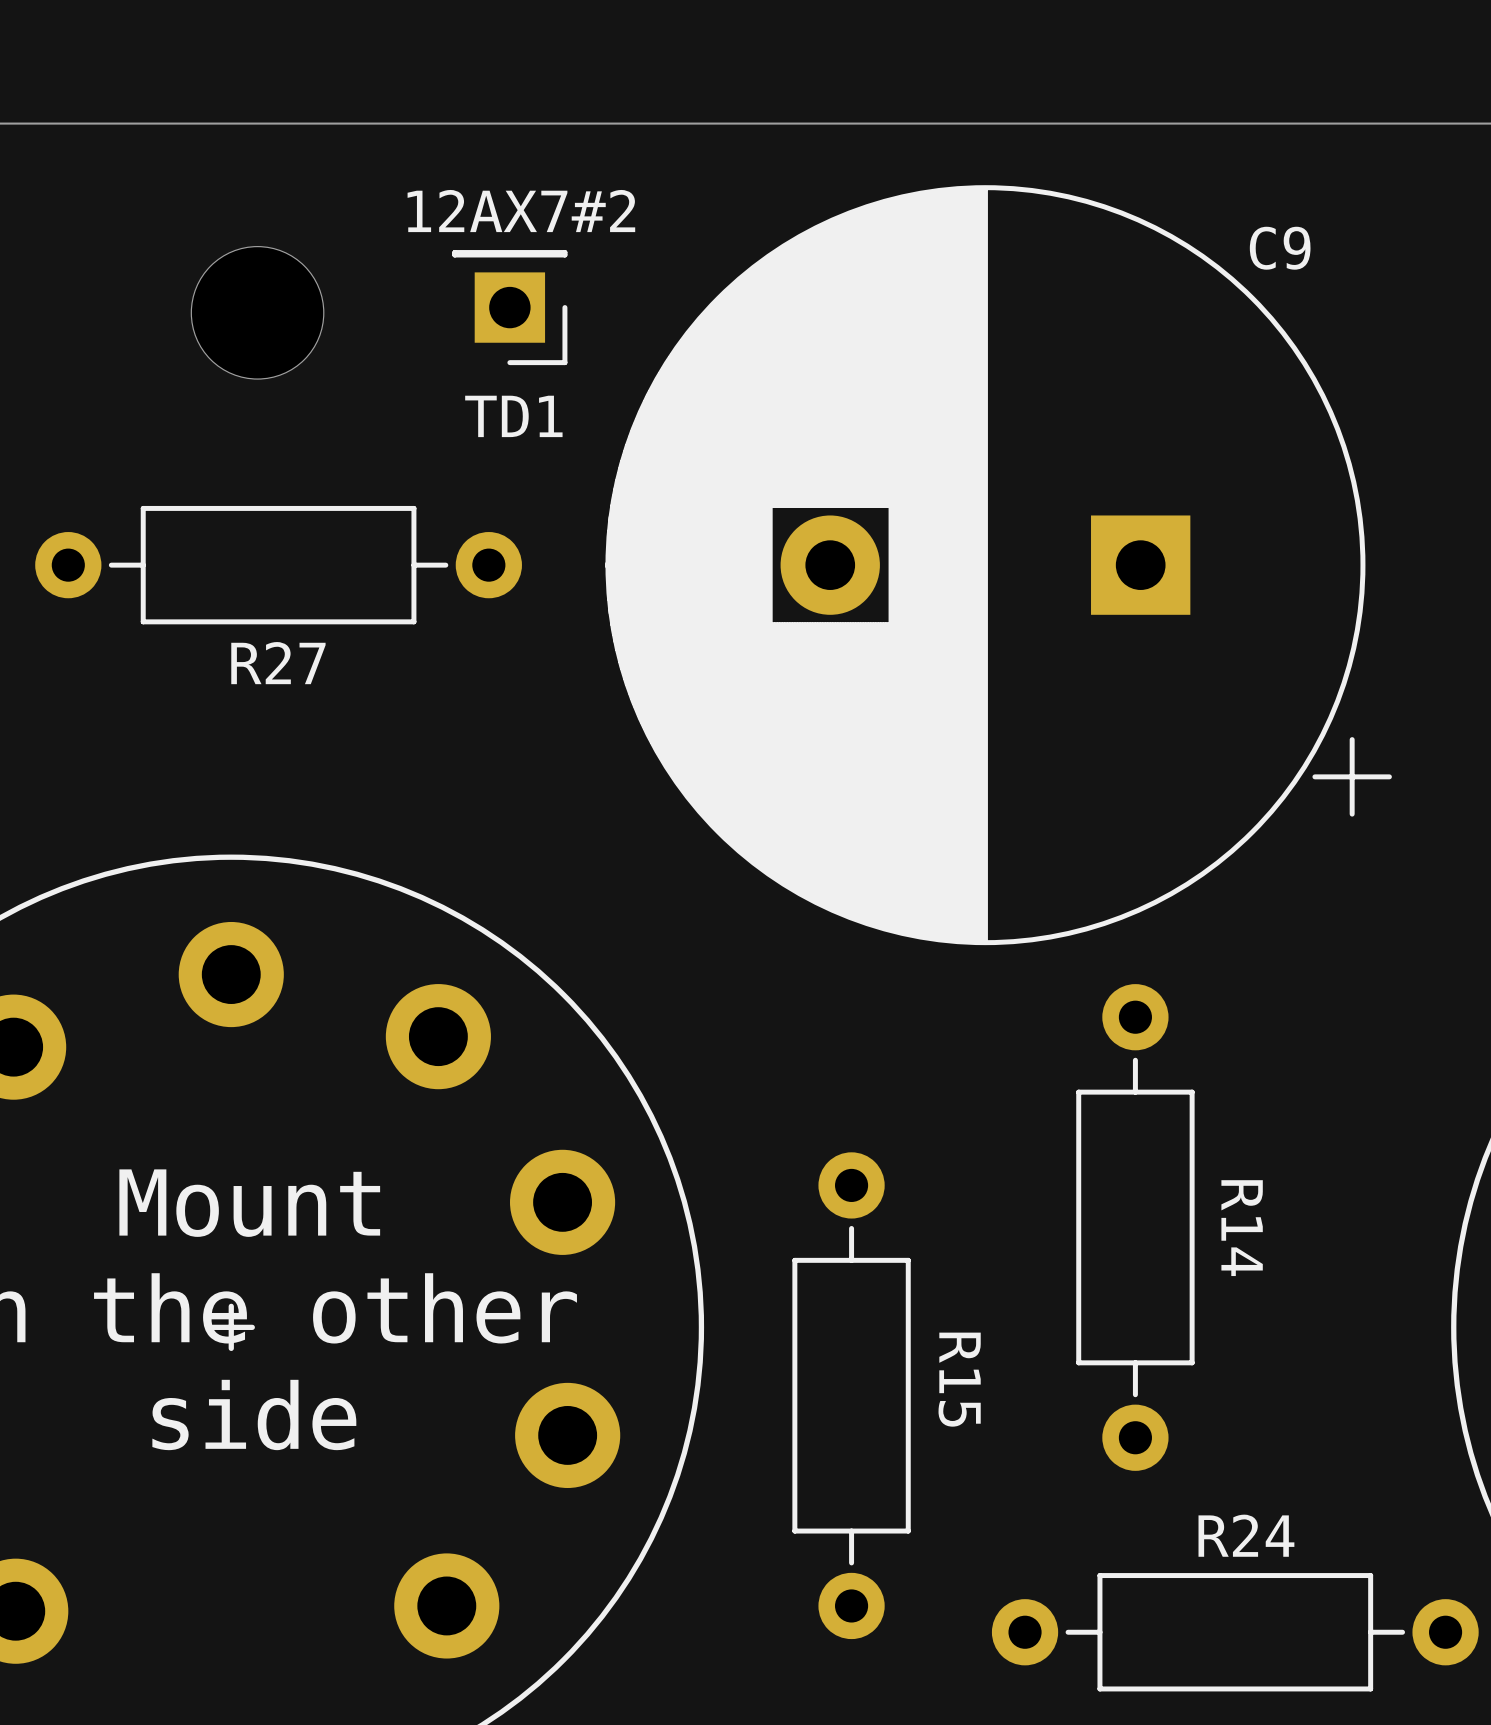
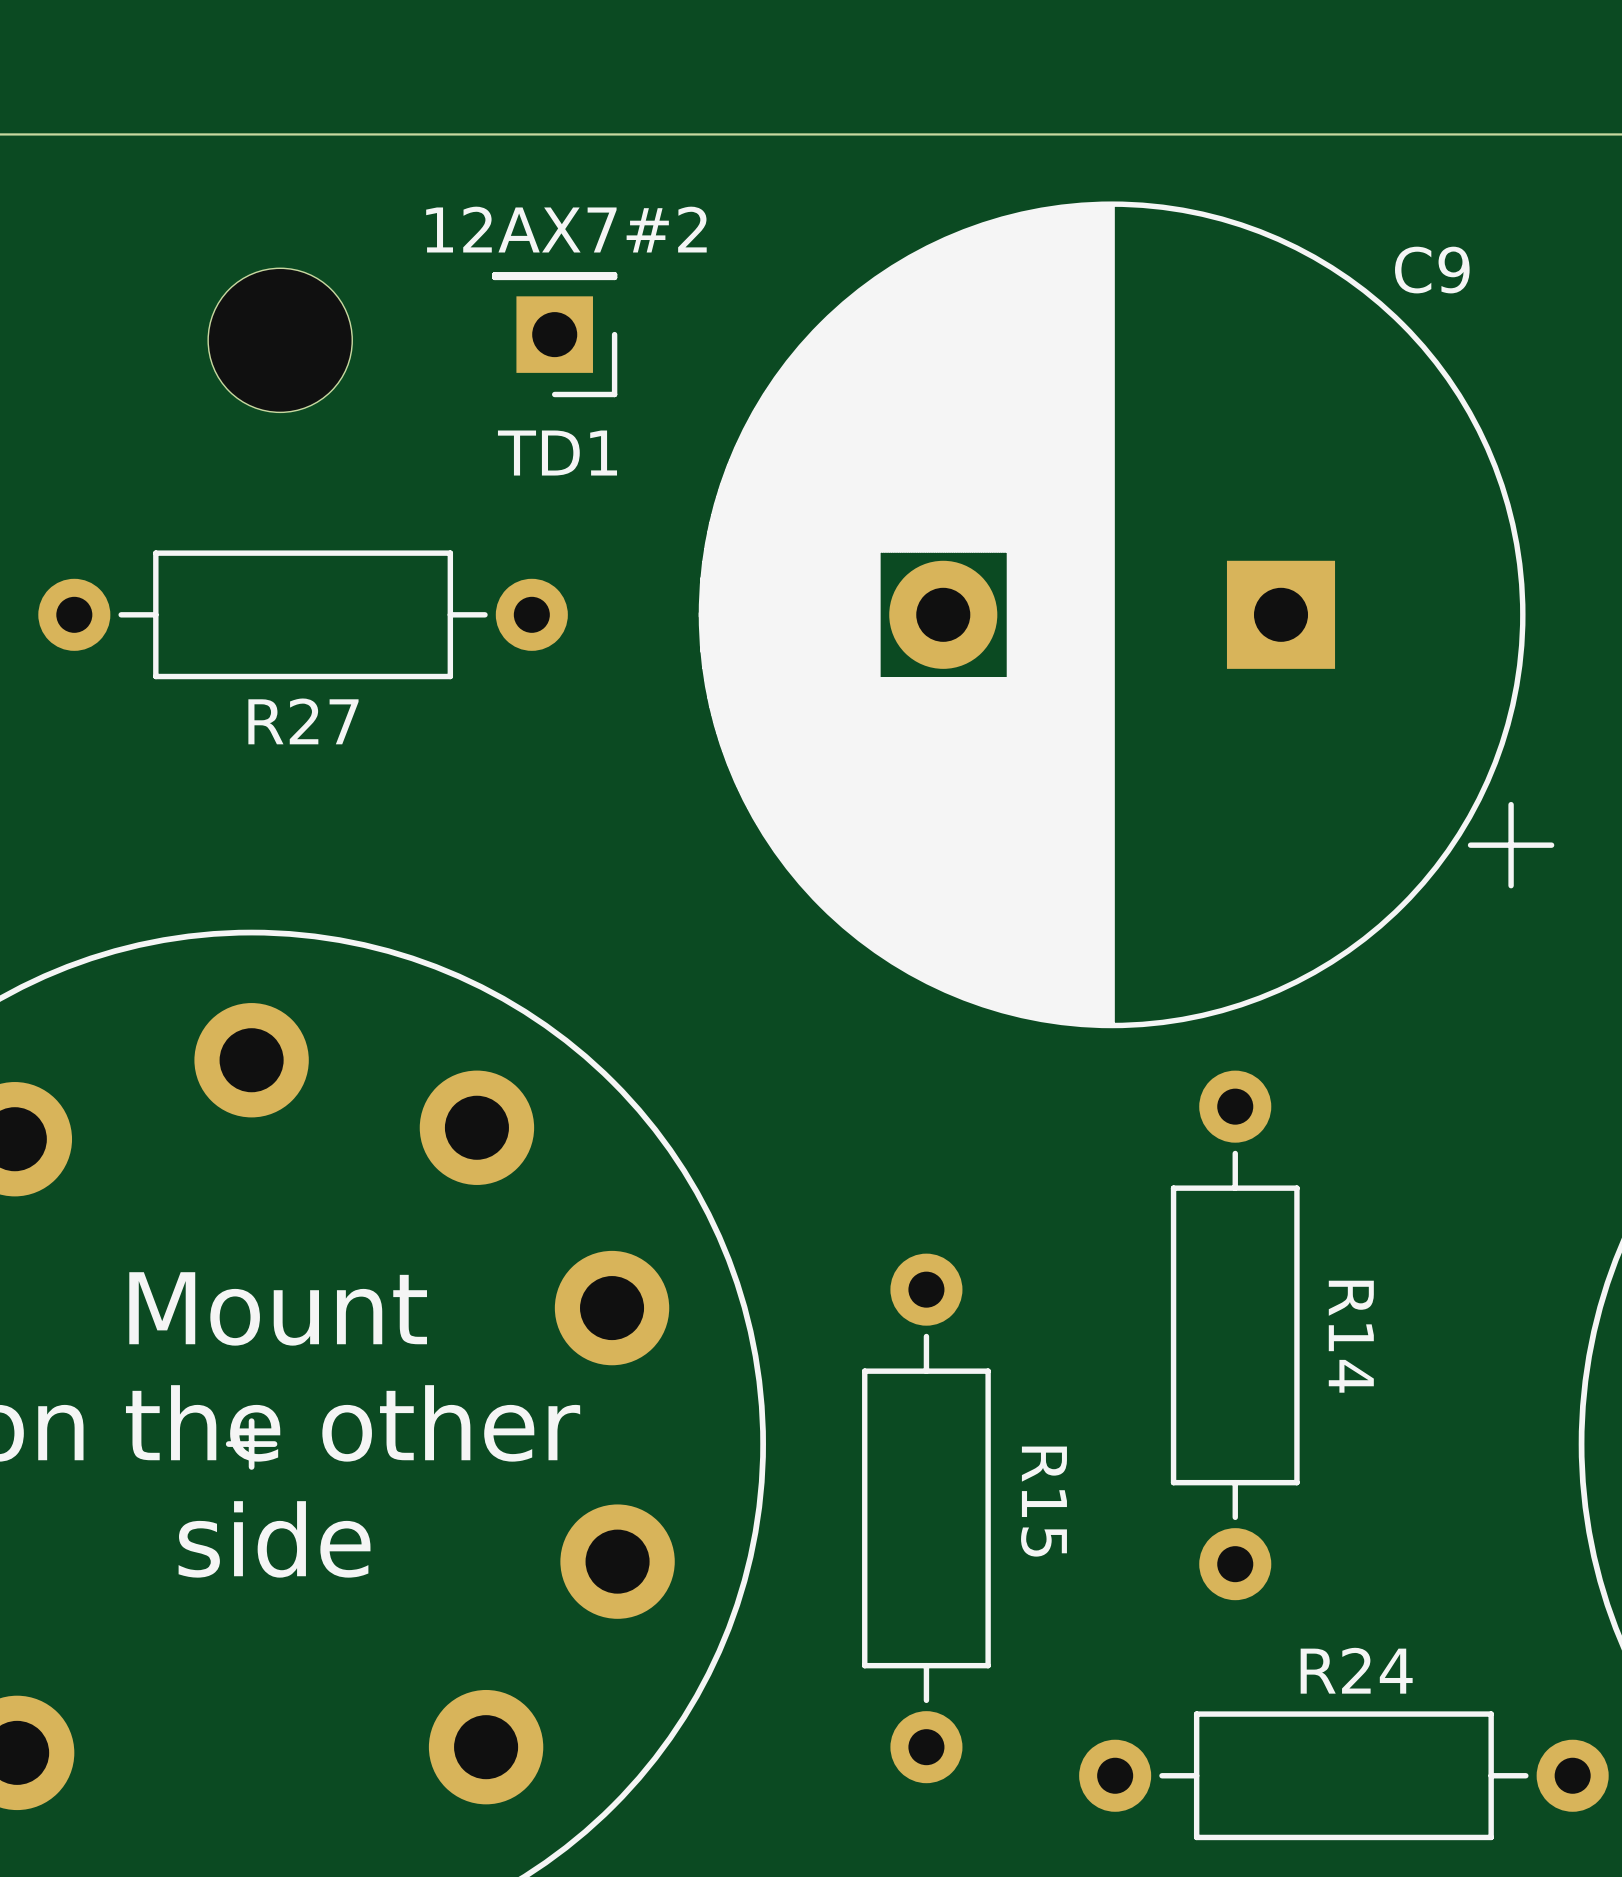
C9 position: (998, 565) -> (1126, 614)

